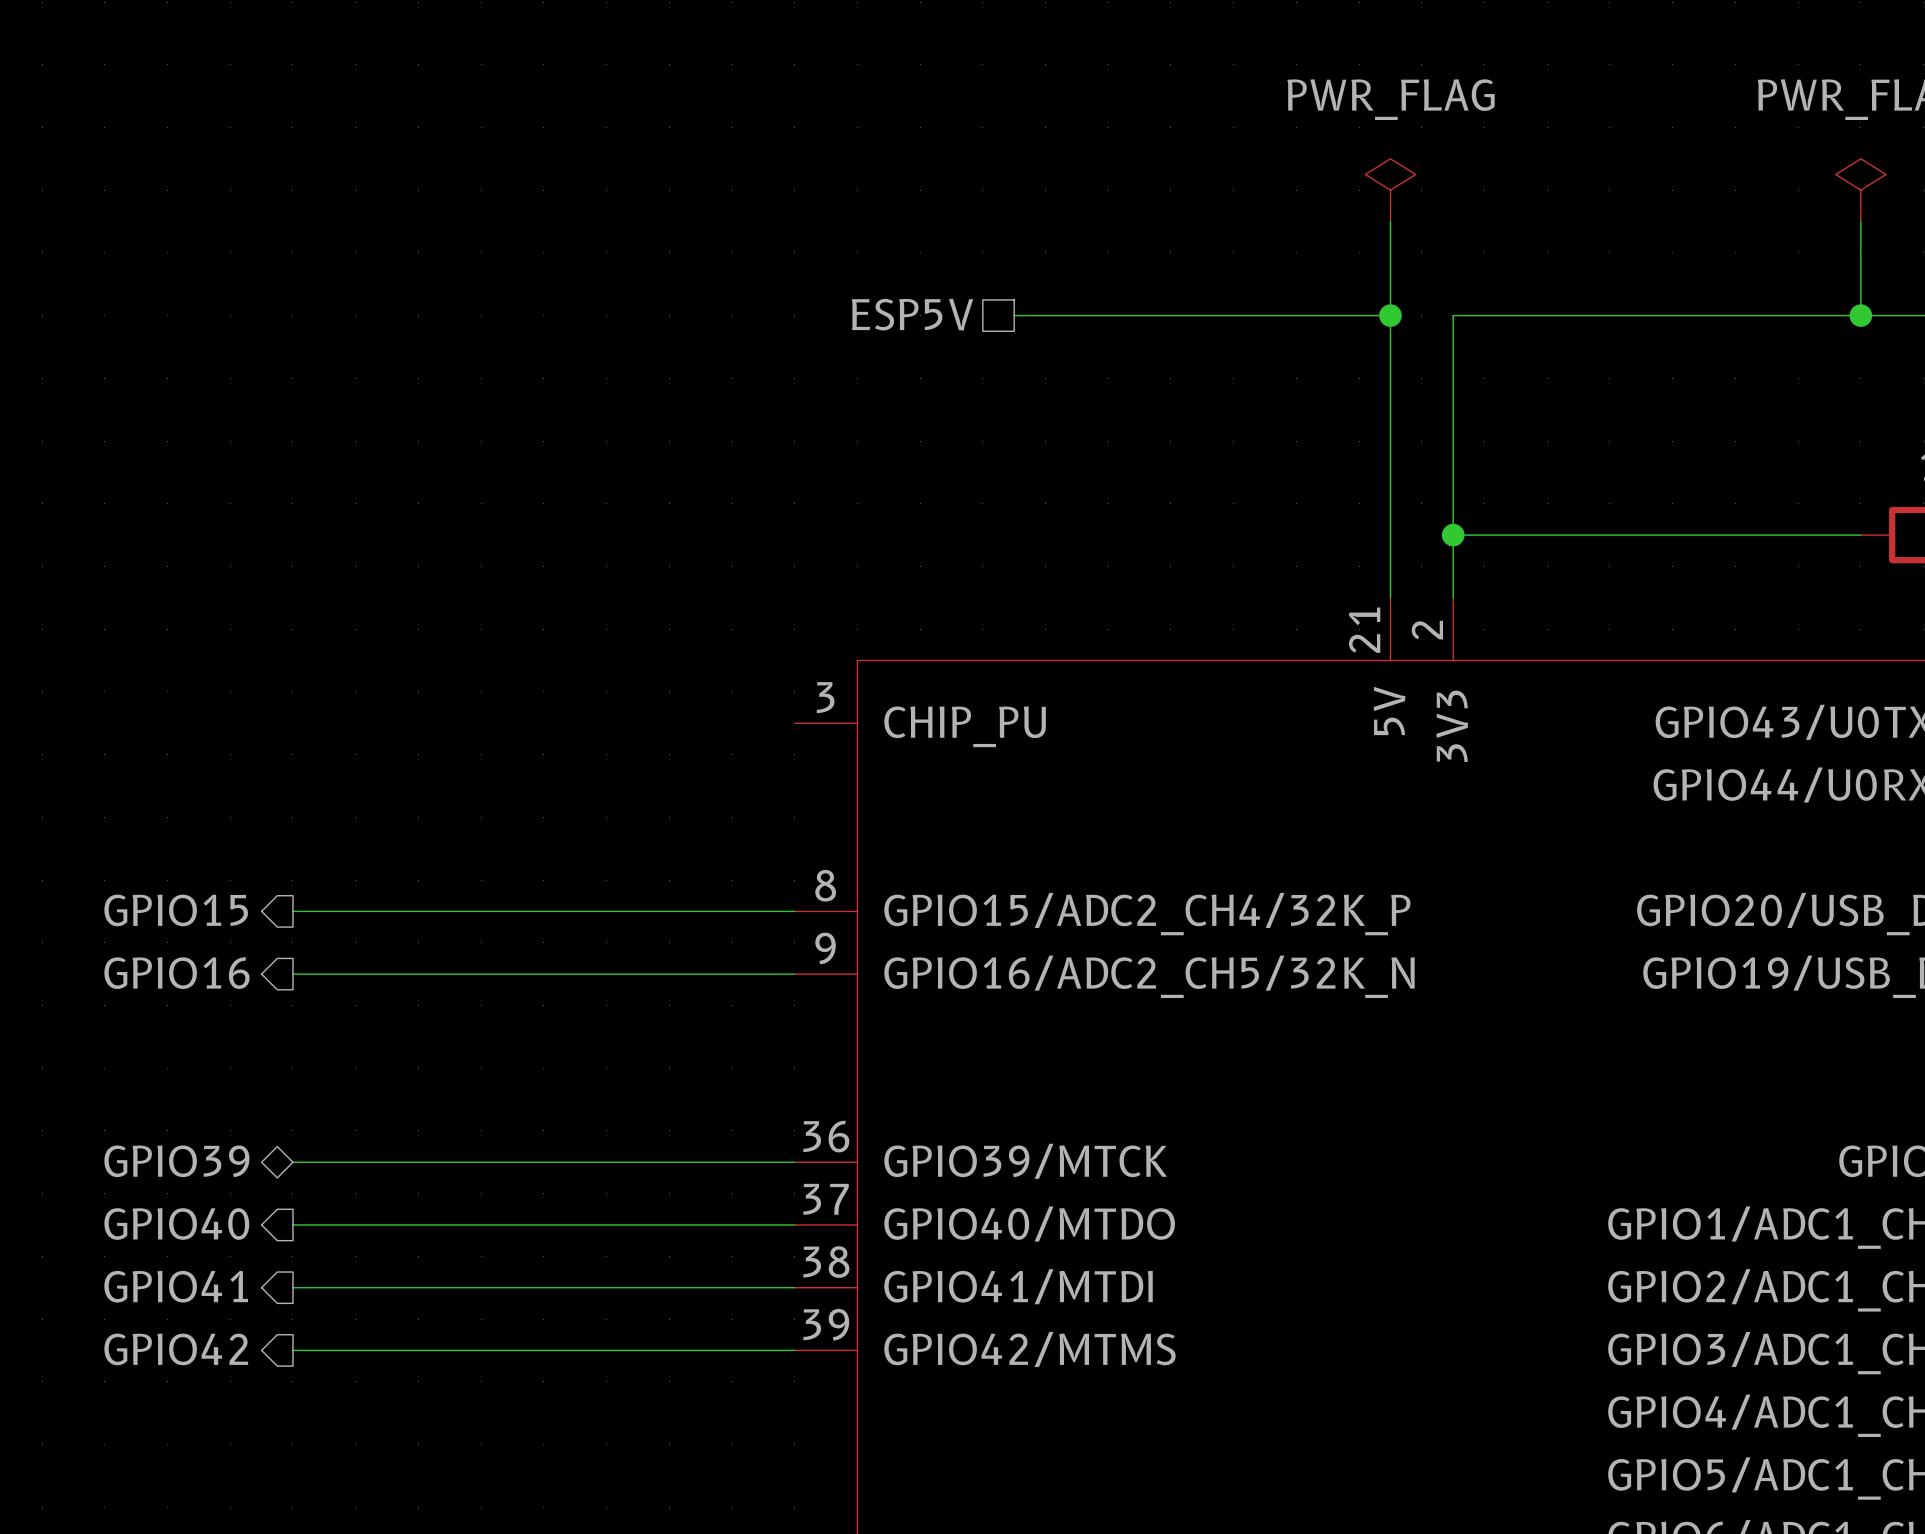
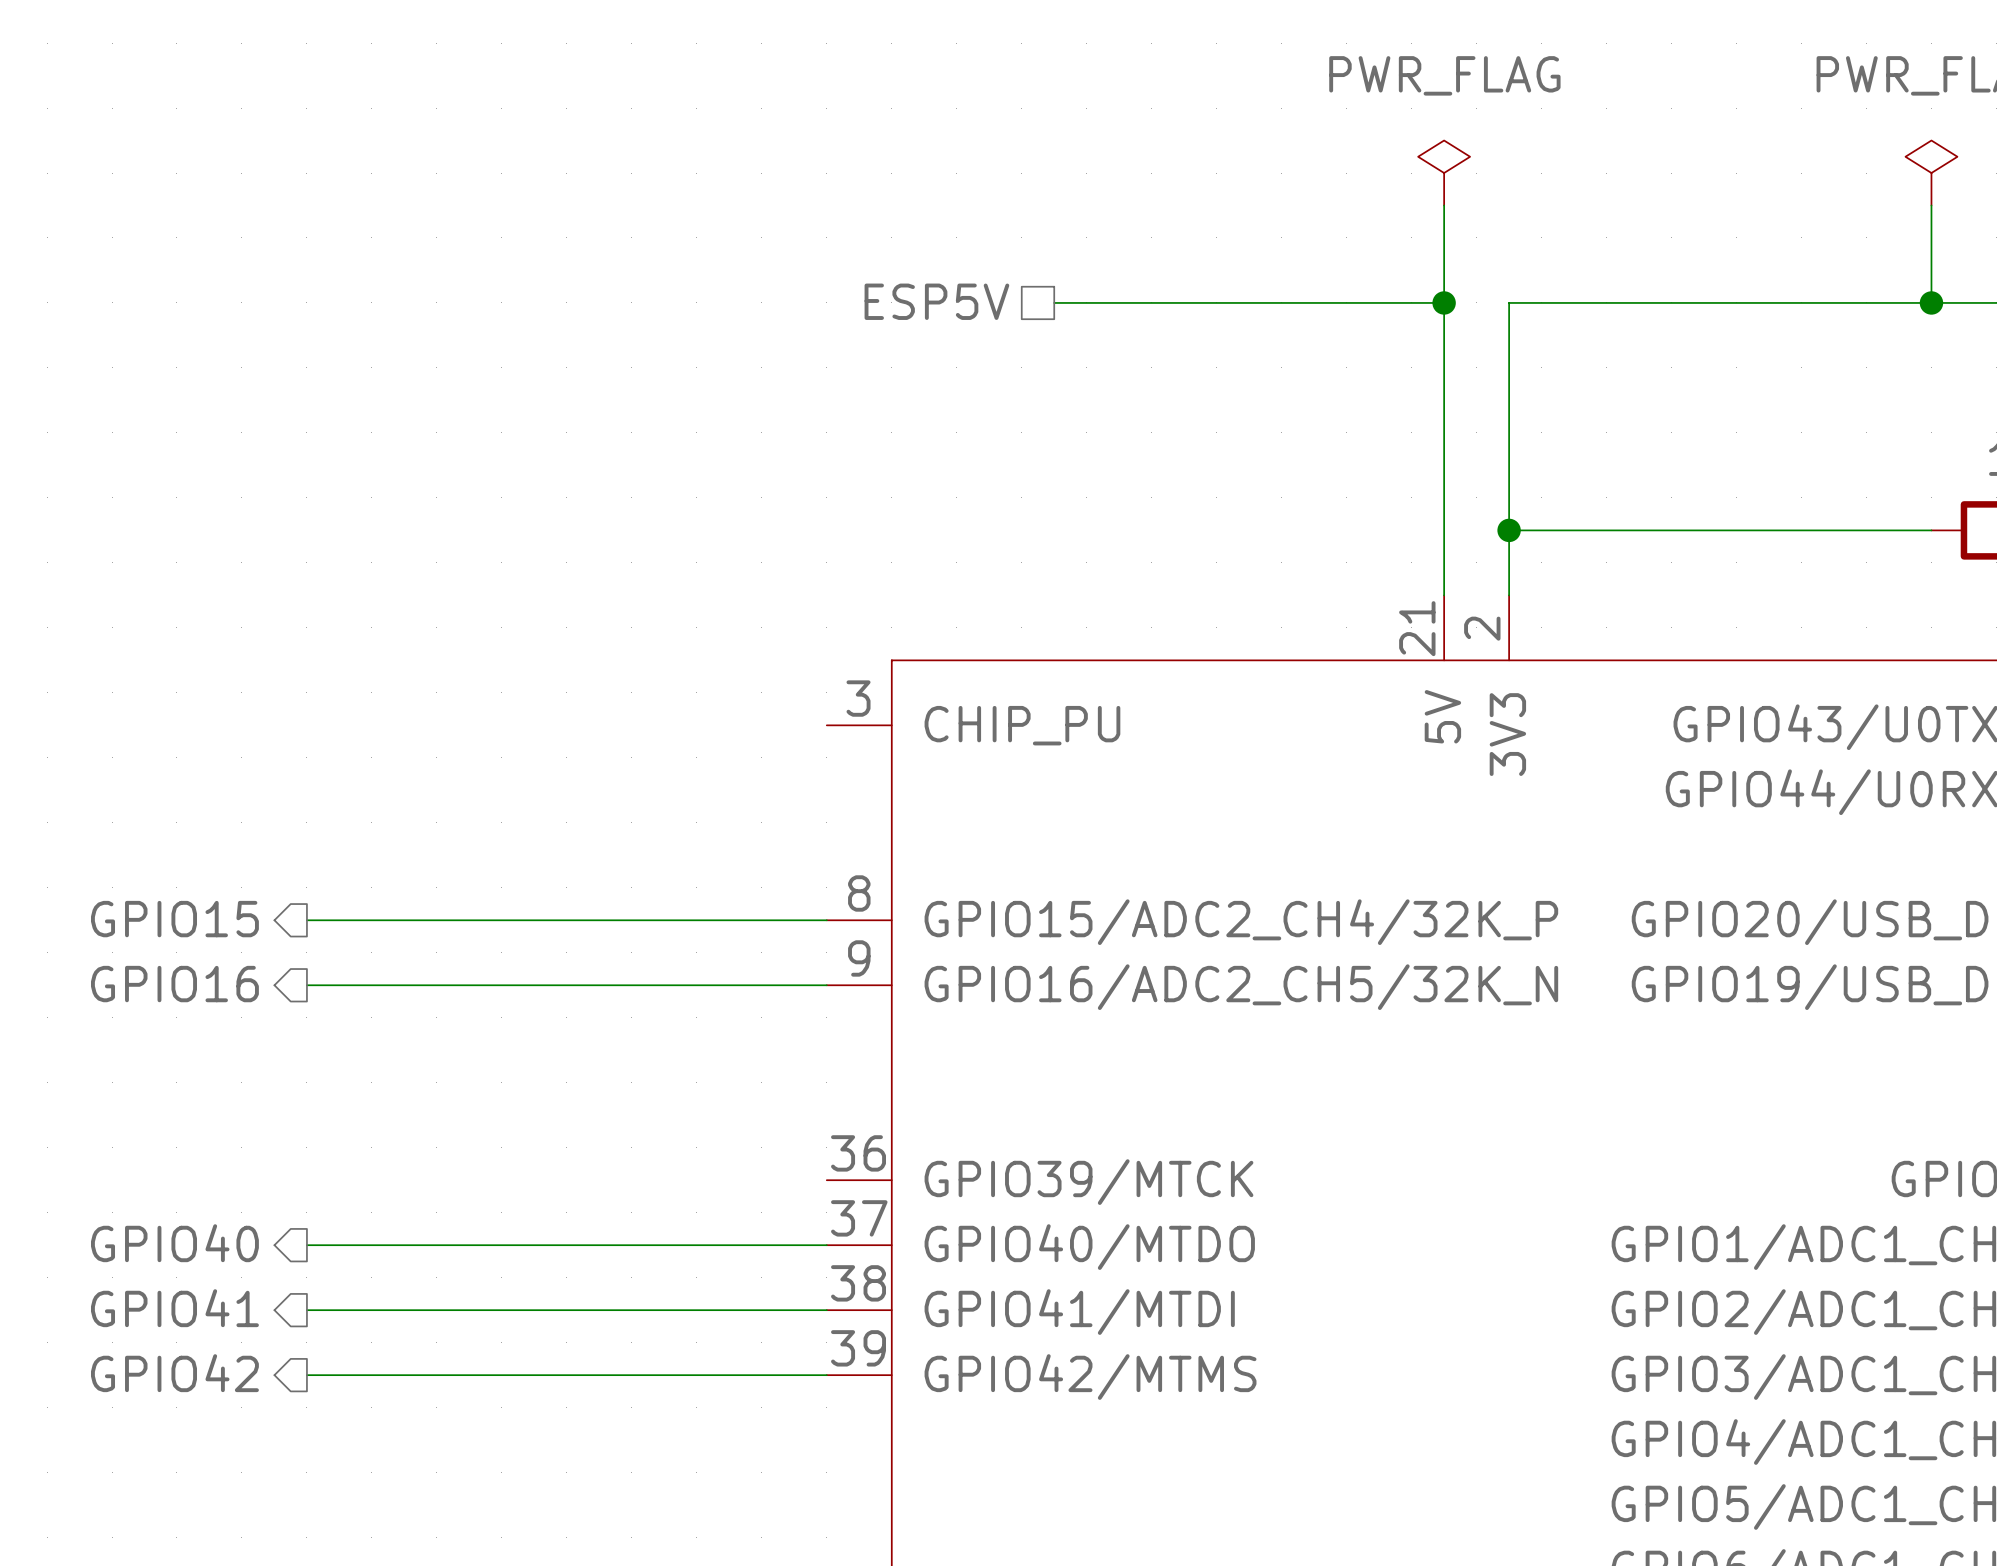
hierarchical label: GPIO39 (176, 1161) -> none
wire: (292, 1162) (794, 1162) -> none

